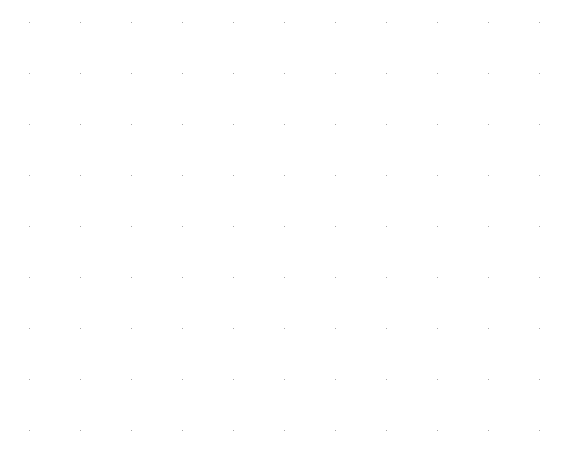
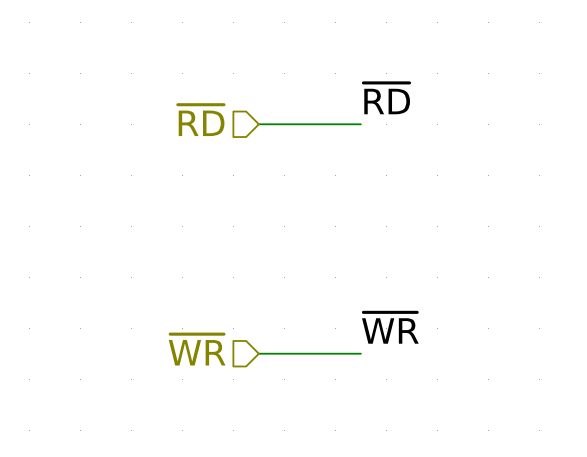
label: none -> ~{RD} (386, 98)
hierarchical label: none -> ~{RD} (201, 120)
wire: none -> (258, 124) (360, 124)
label: none -> ~{WR} (390, 328)
hierarchical label: none -> ~{WR} (197, 349)
wire: none -> (258, 353) (360, 353)

